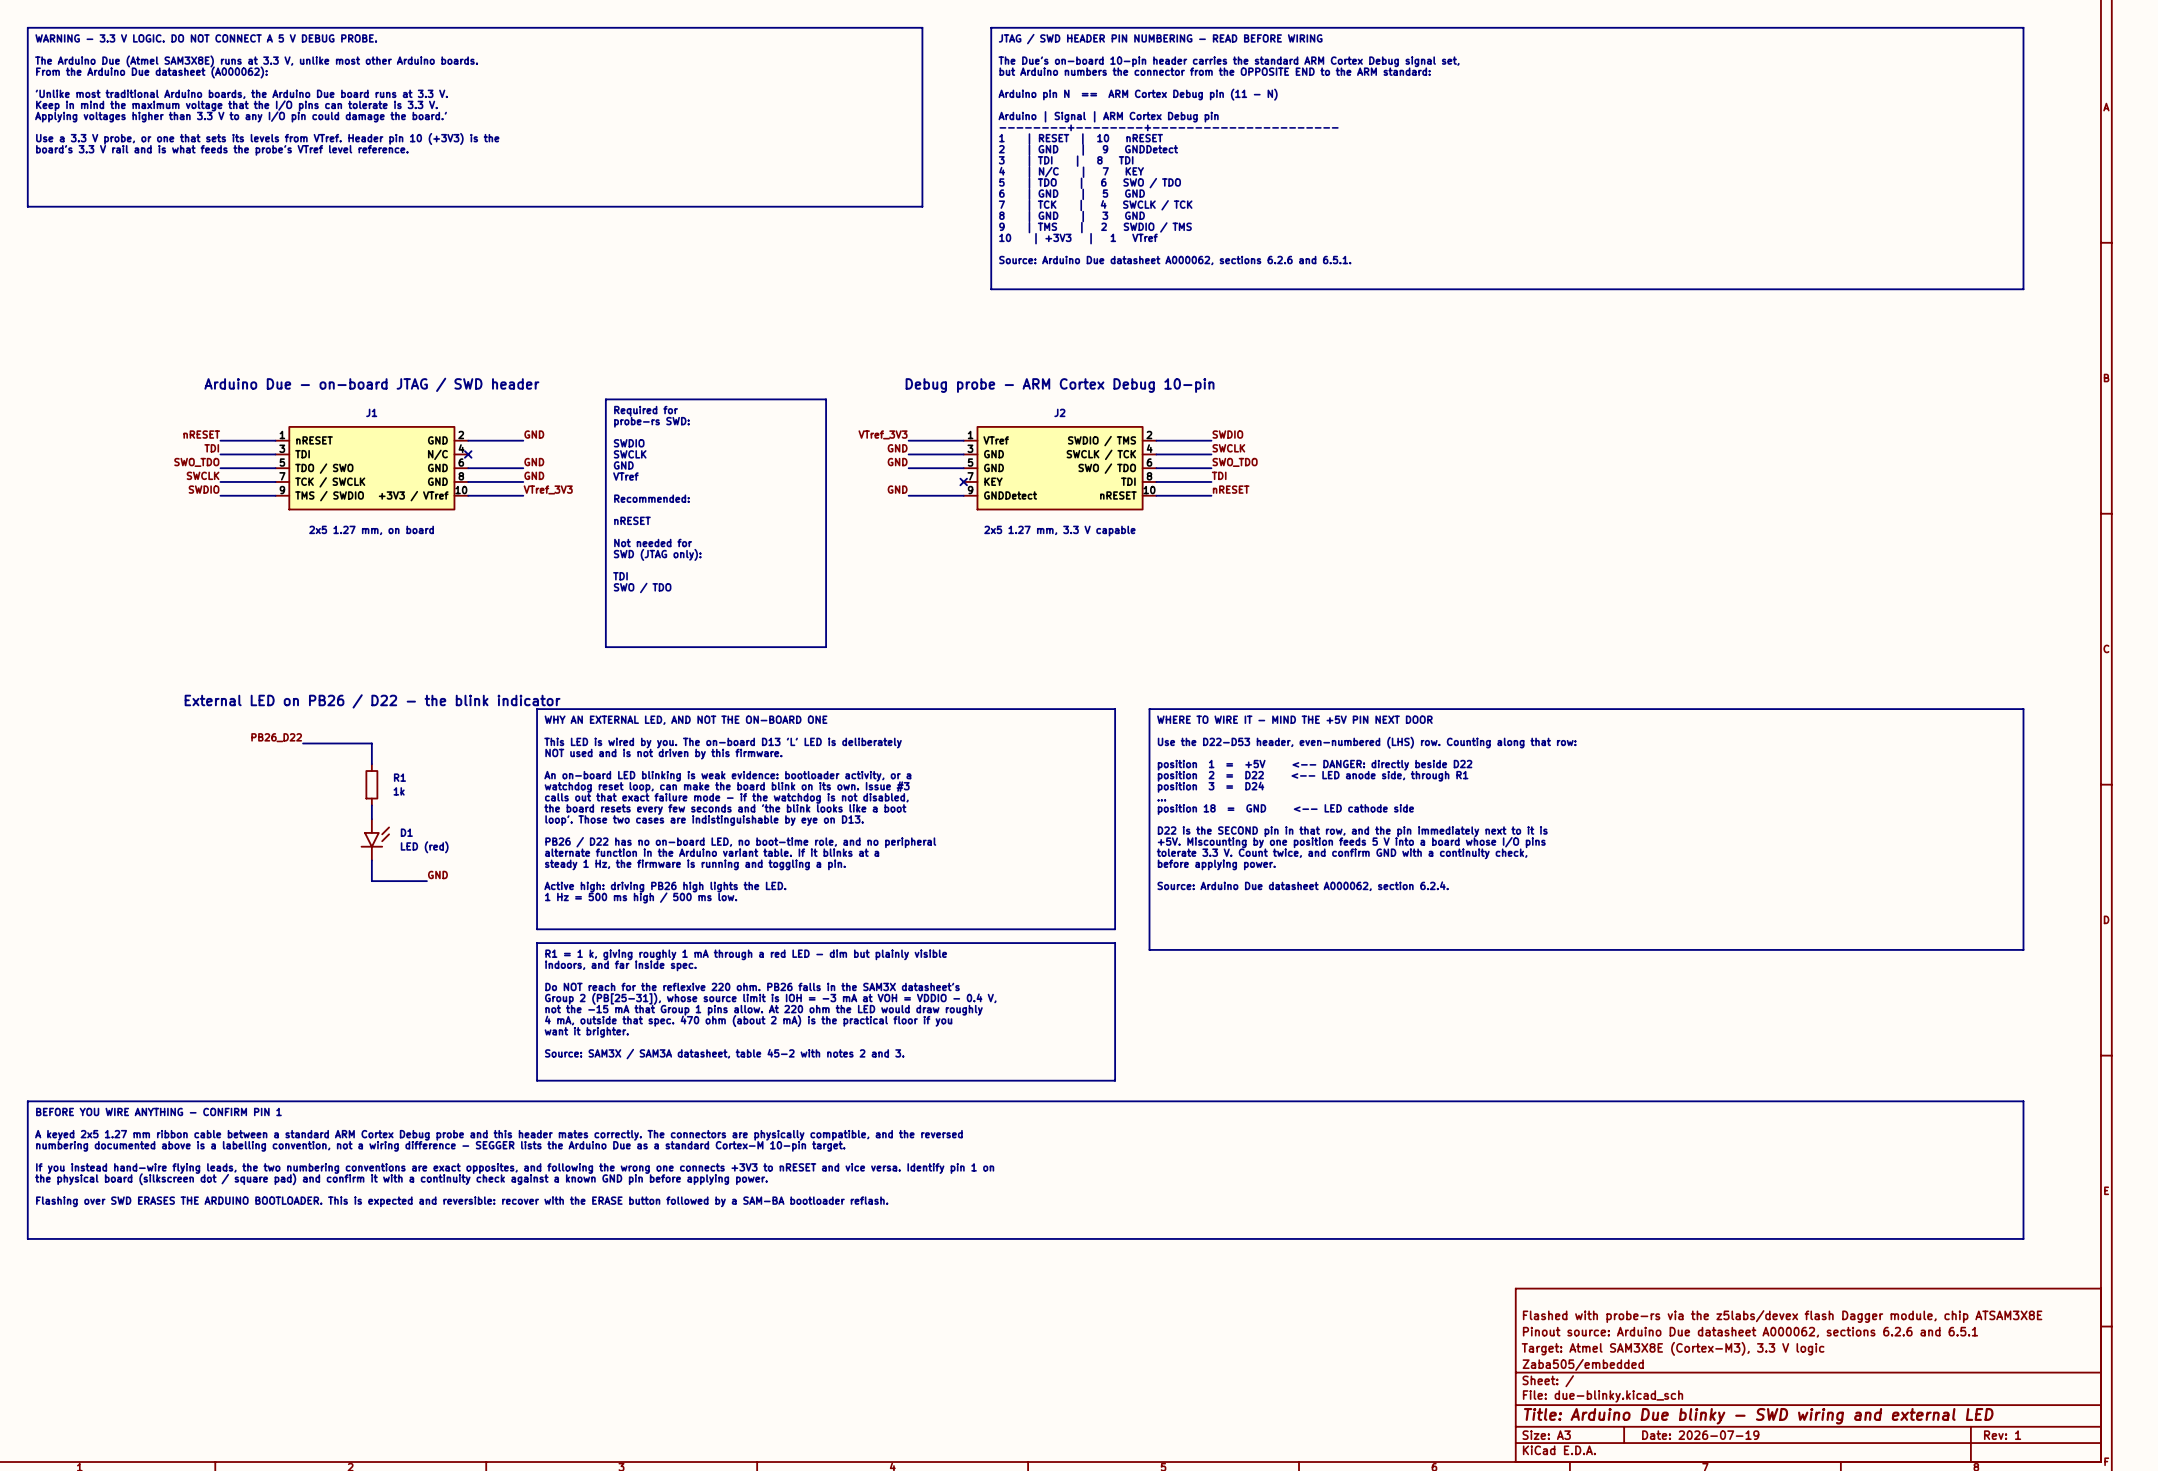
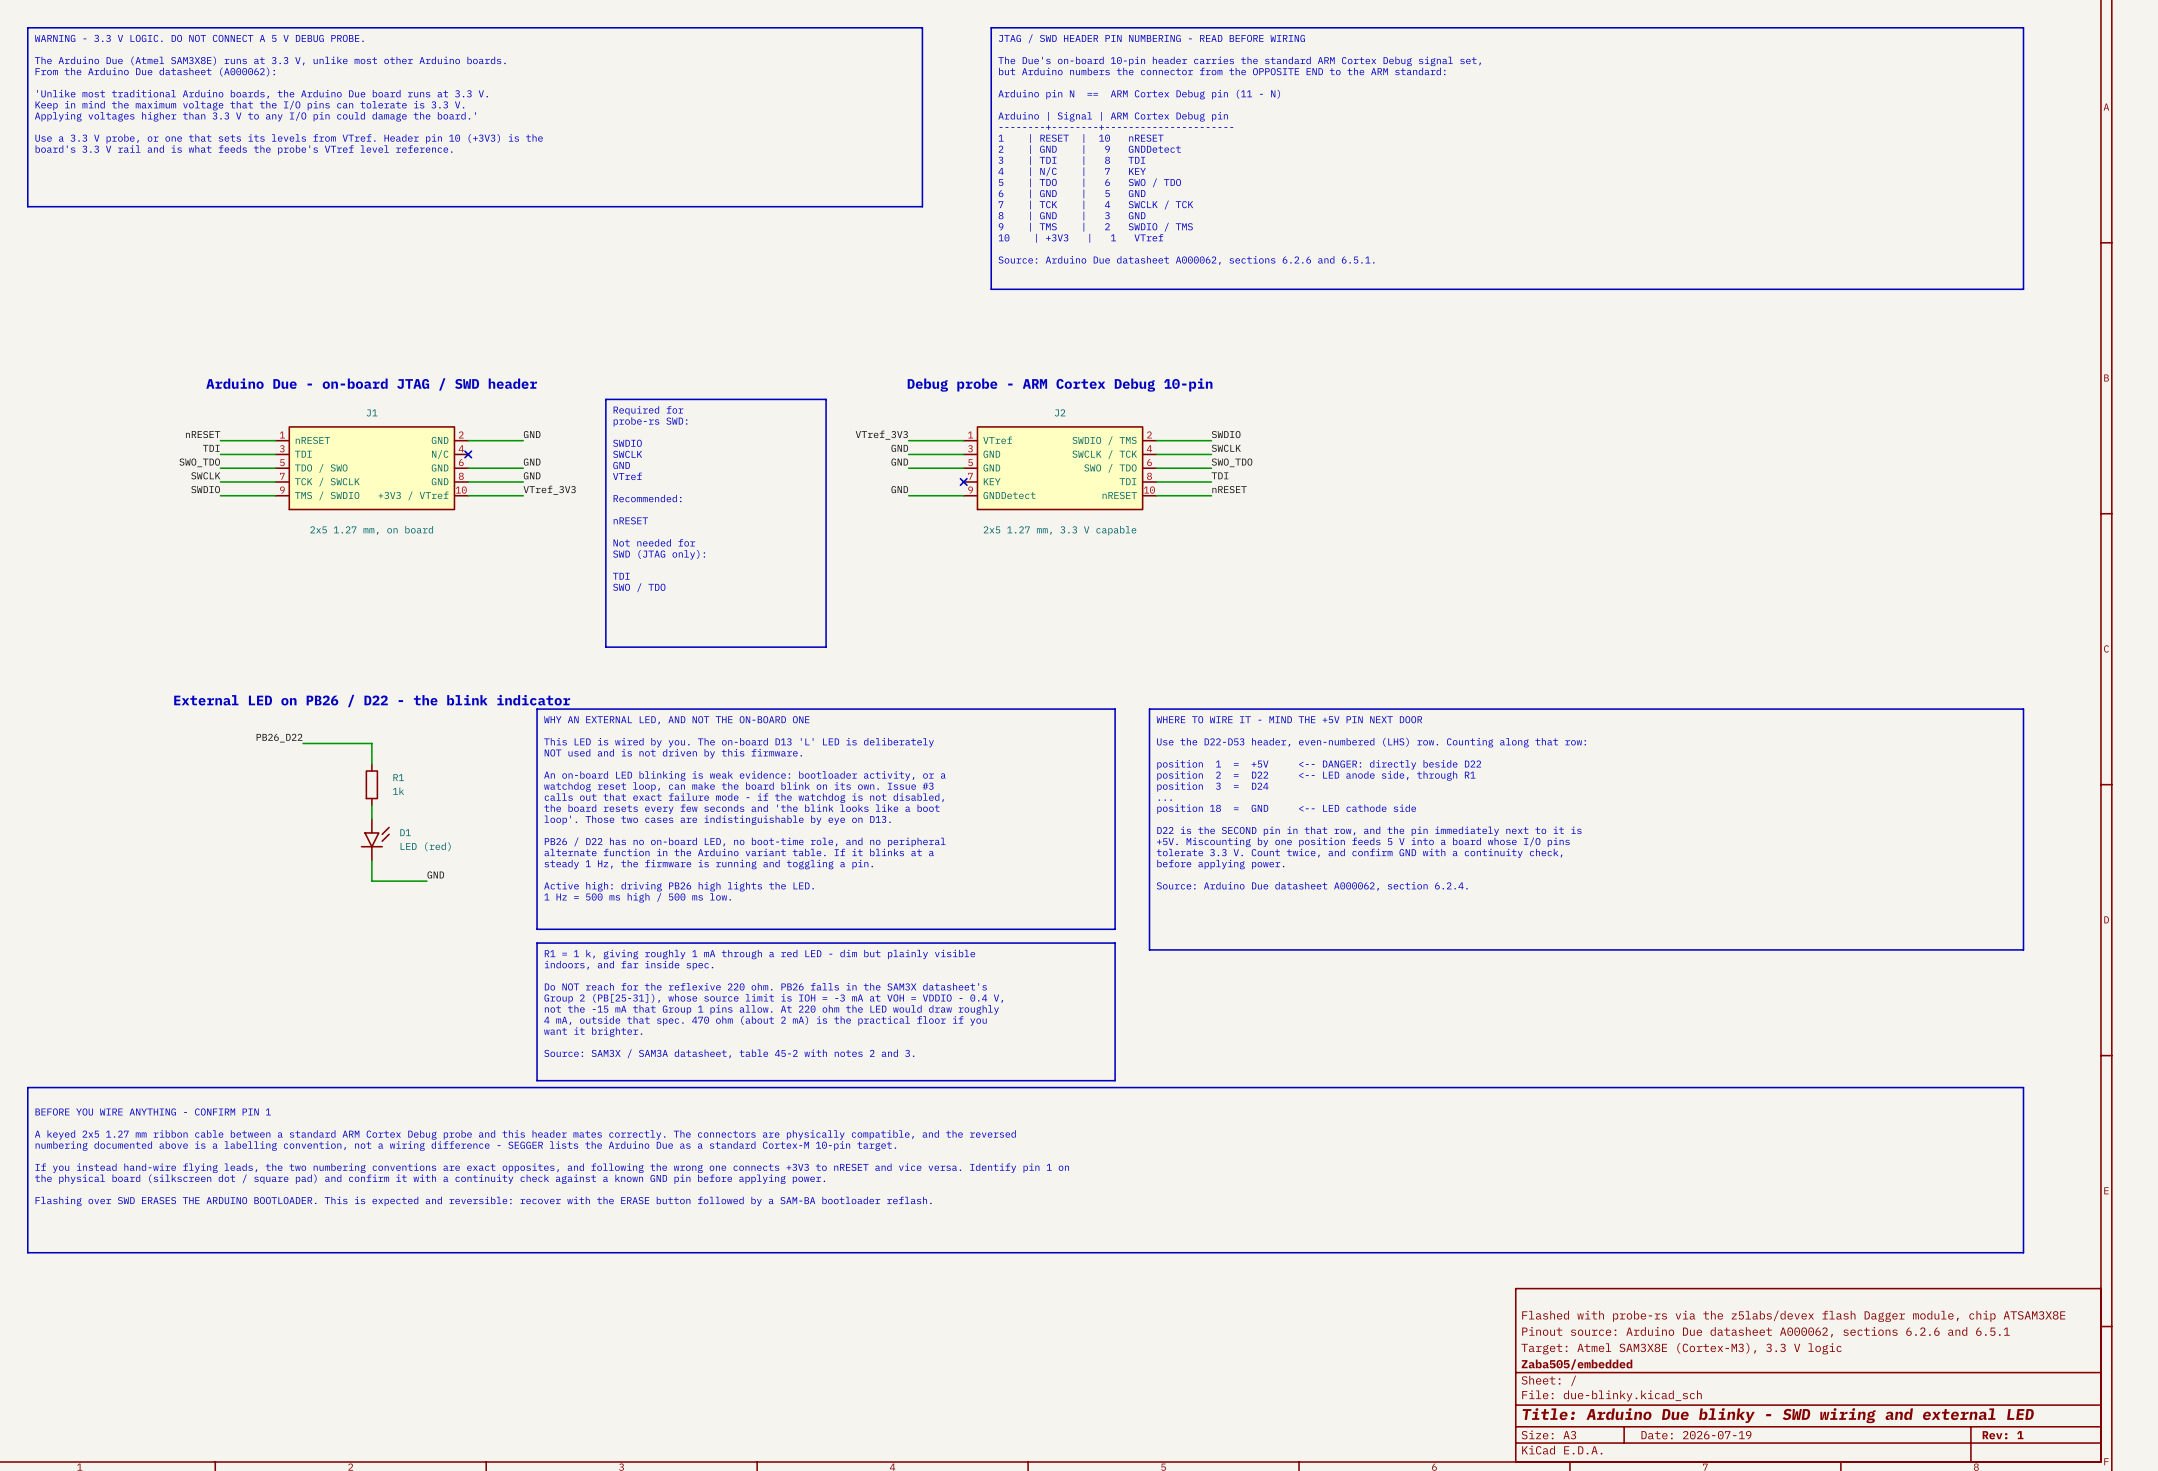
line: (27, 1101) (2023, 1101) -> (27, 1101) (27, 1087) (2023, 1087) (2023, 1101)
line: (27, 1238) (2023, 1238) -> (27, 1238) (27, 1252) (2023, 1252) (2023, 1238)

